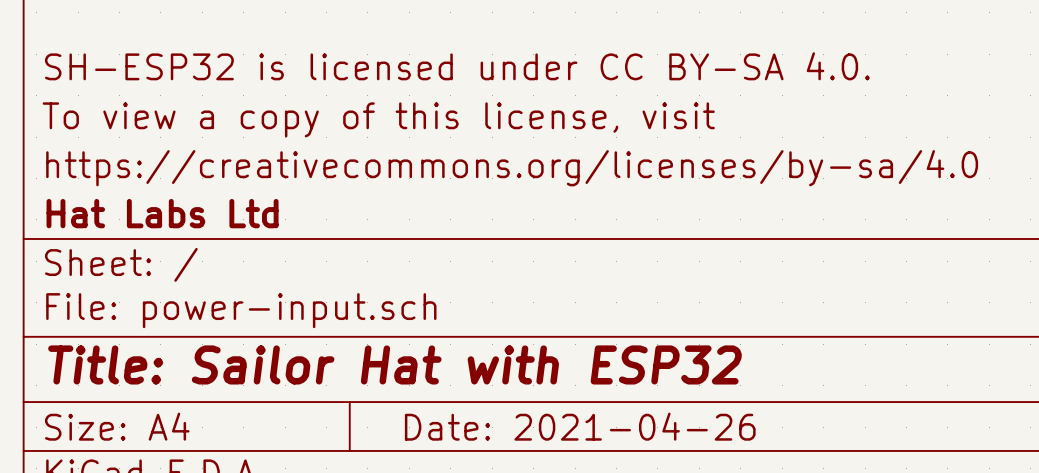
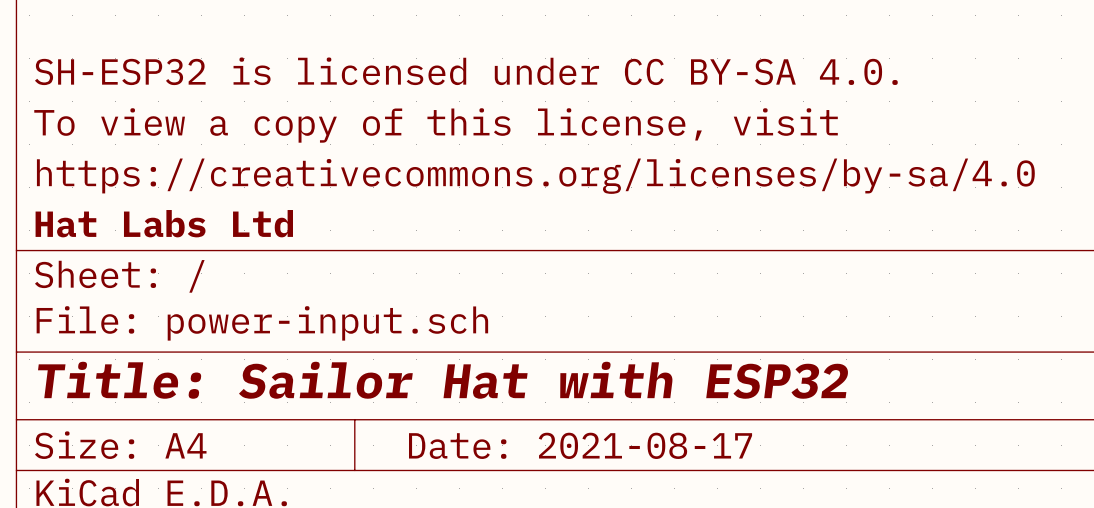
title block: Date: 2021-04-26 (580, 426) -> Date: 2021-08-17 (580, 445)

